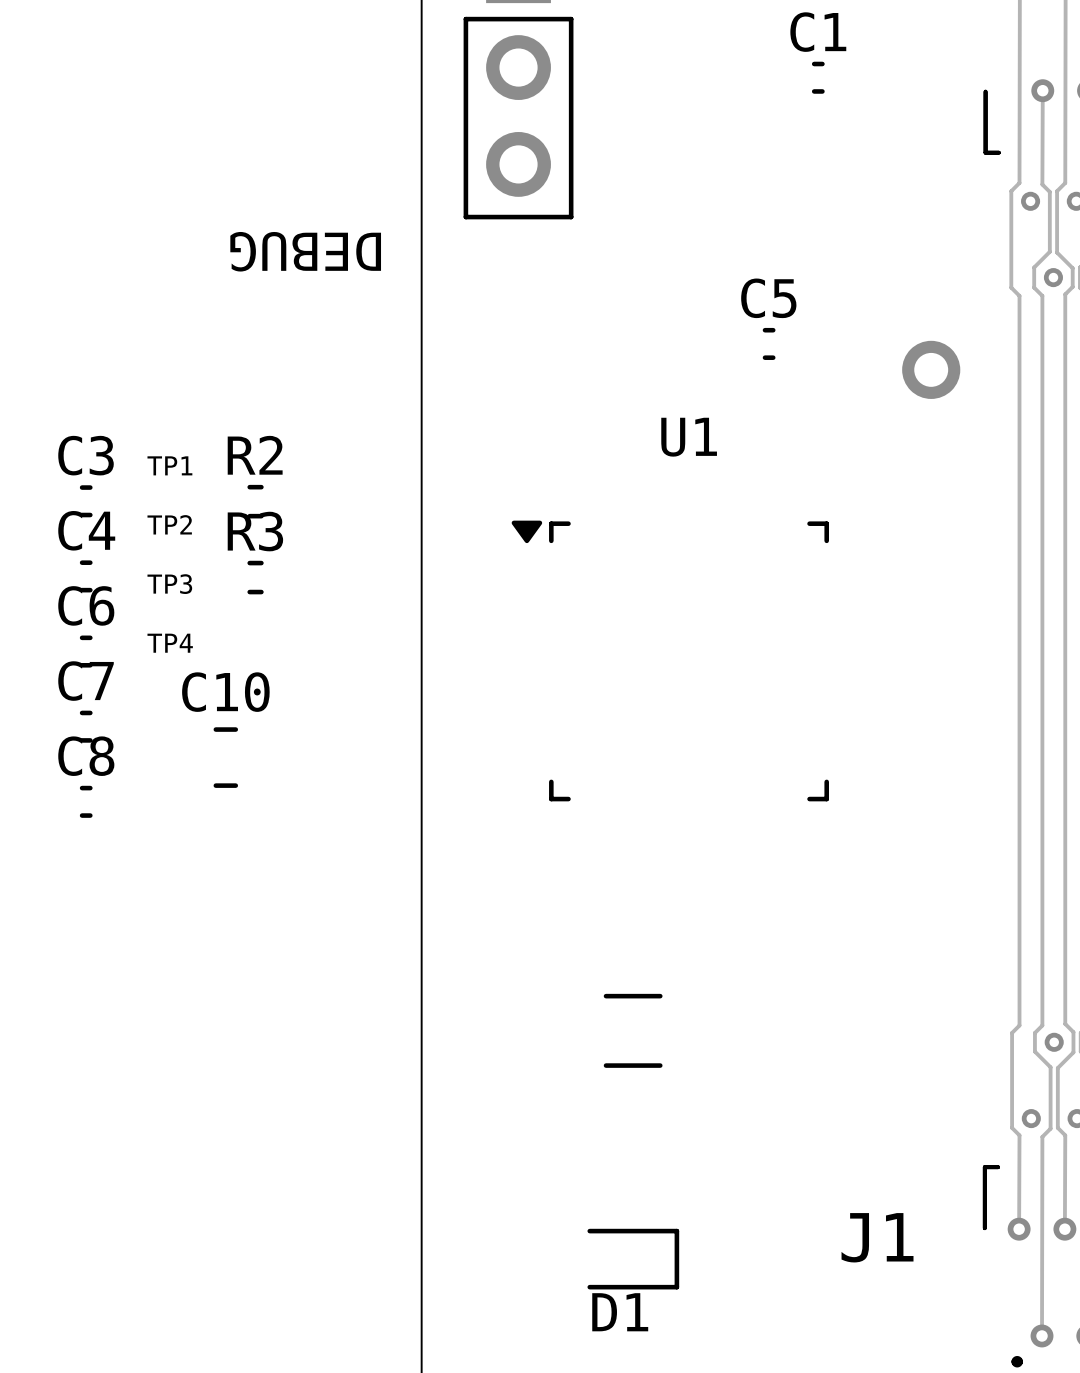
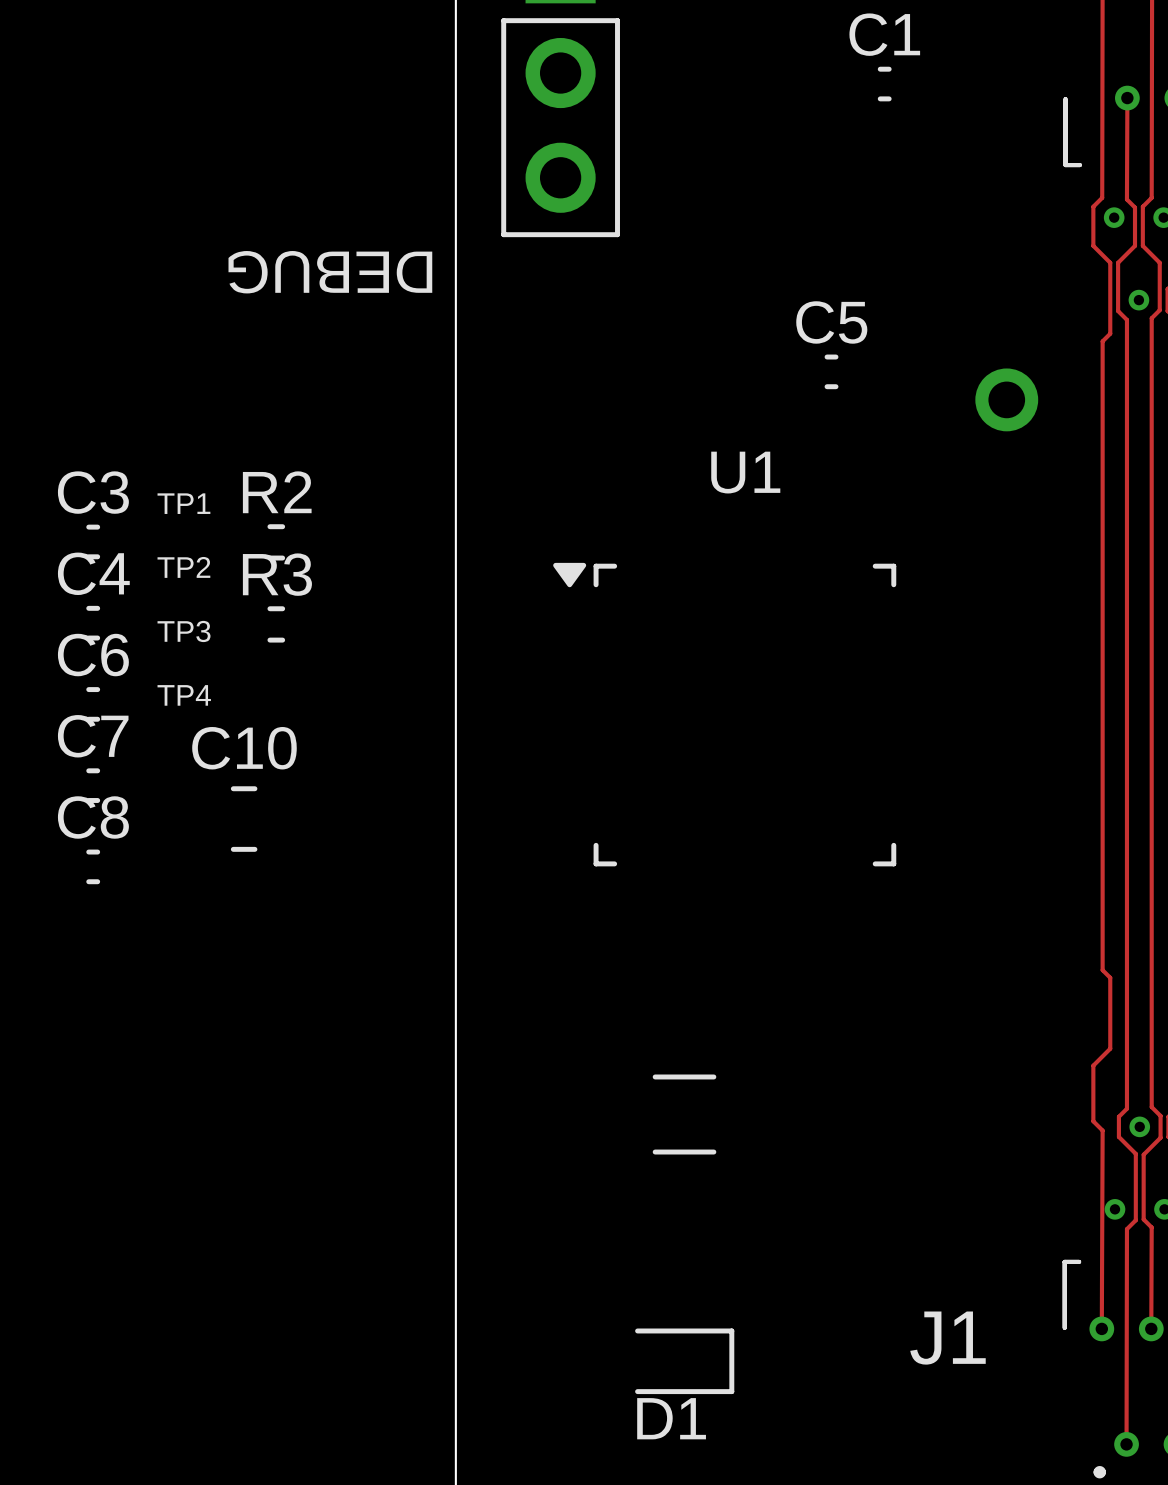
track: (1011, 227) (1011, 287) (1019, 295) (1019, 1025) (1012, 1032) (1012, 1127) (1019, 1135) (1019, 1229) -> (1093, 245) (1110, 262) (1110, 333) (1102, 341) (1102, 970) (1110, 977) (1110, 1048) (1093, 1065) (1093, 1121) (1102, 1130) (1101, 1328)
track: (1049, 227) (1049, 251) (1034, 267) -> (1135, 245) (1118, 262) (1118, 289)
track: (1057, 227) (1057, 252) (1072, 268) -> (1142, 245) (1159, 262) (1159, 290)

